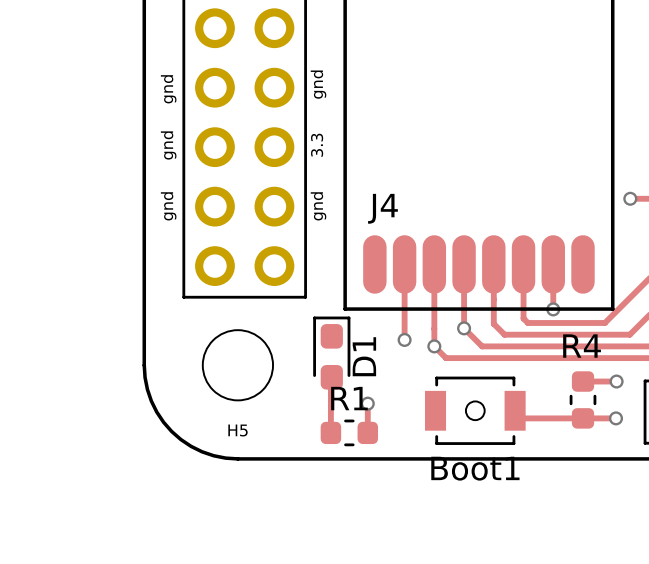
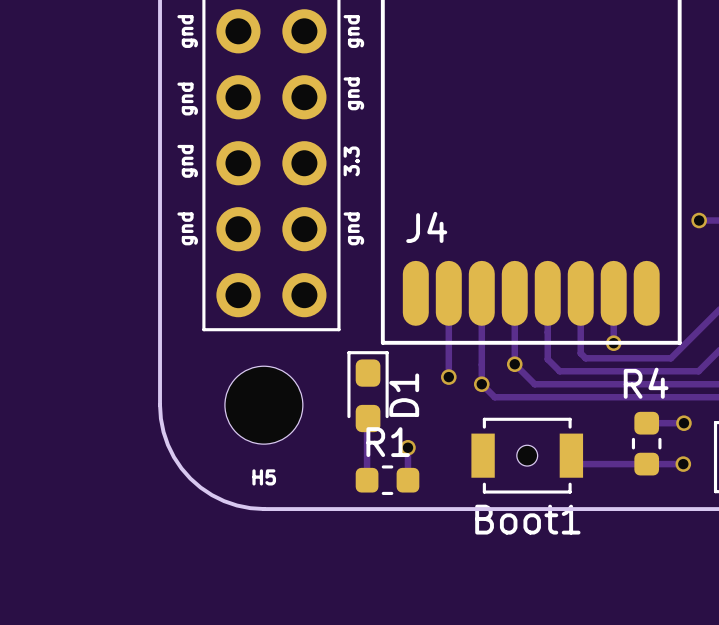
text: none -> gnd (187, 31)
text: none -> gnd (353, 31)

